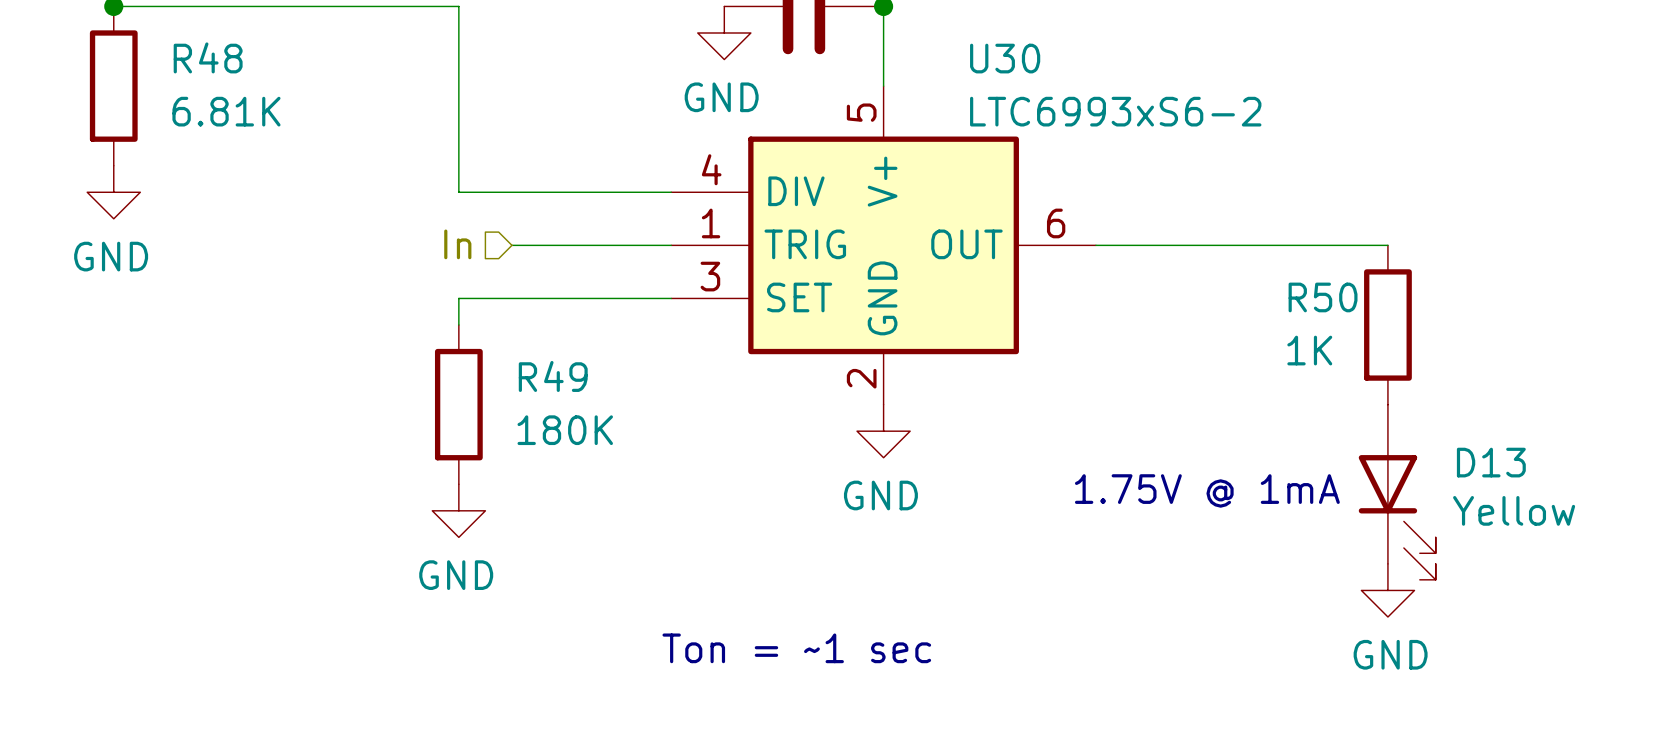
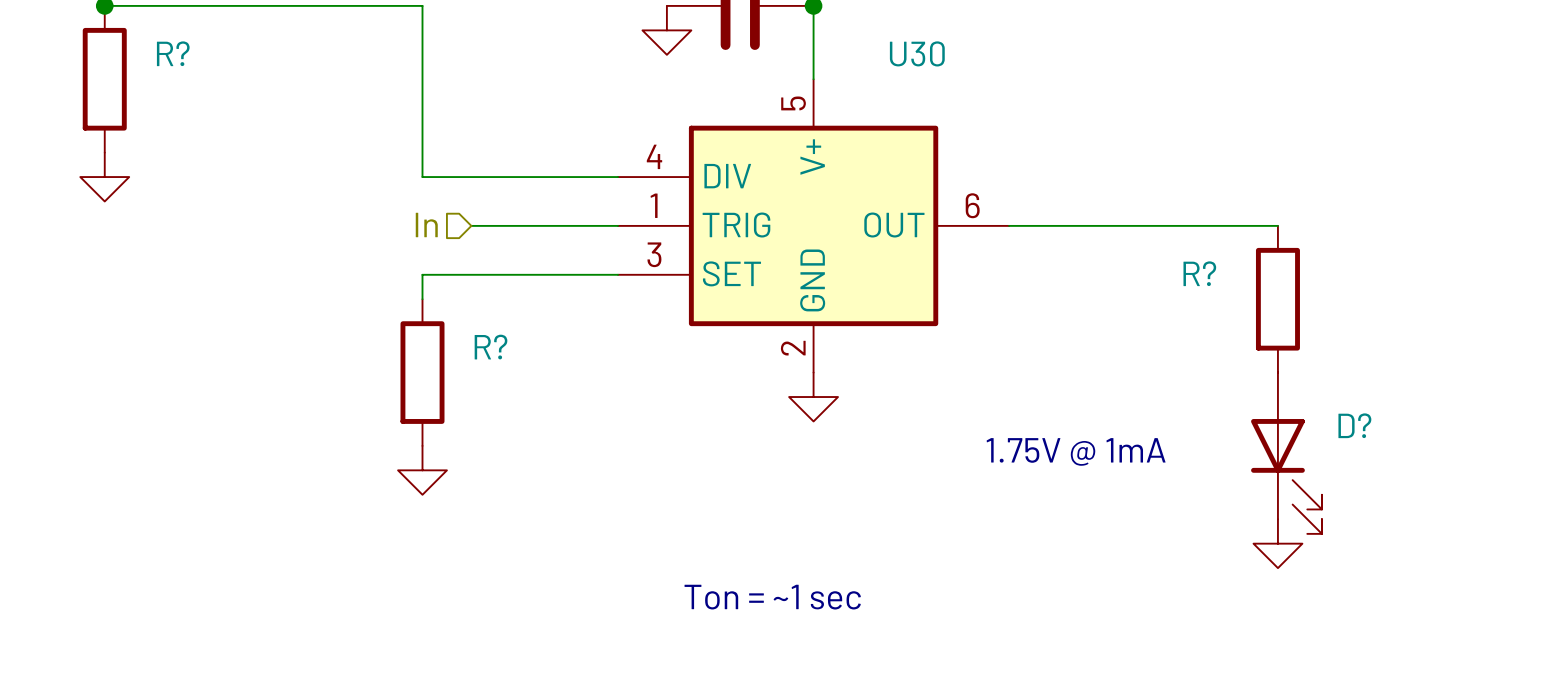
R48 name: R48 (208, 57) -> R? (173, 53)
power symbol text: GND (721, 97) -> none
R48 value: 6.81K (226, 111) -> none
U30 value: LTC6993xS6-2 (1115, 111) -> none
power symbol text: GND (111, 256) -> none
R50 name: R50 (1323, 297) -> R? (1199, 273)
R50 value: 1K (1309, 350) -> none
R49 name: R49 (553, 376) -> R? (491, 347)
R49 value: 180K (565, 430) -> none
D13 name: D13 (1491, 462) -> D? (1354, 425)
power symbol text: GND (880, 495) -> none
D13 value: Yellow (1514, 510) -> none
power symbol text: GND (456, 575) -> none
power symbol text: GND (1390, 654) -> none

